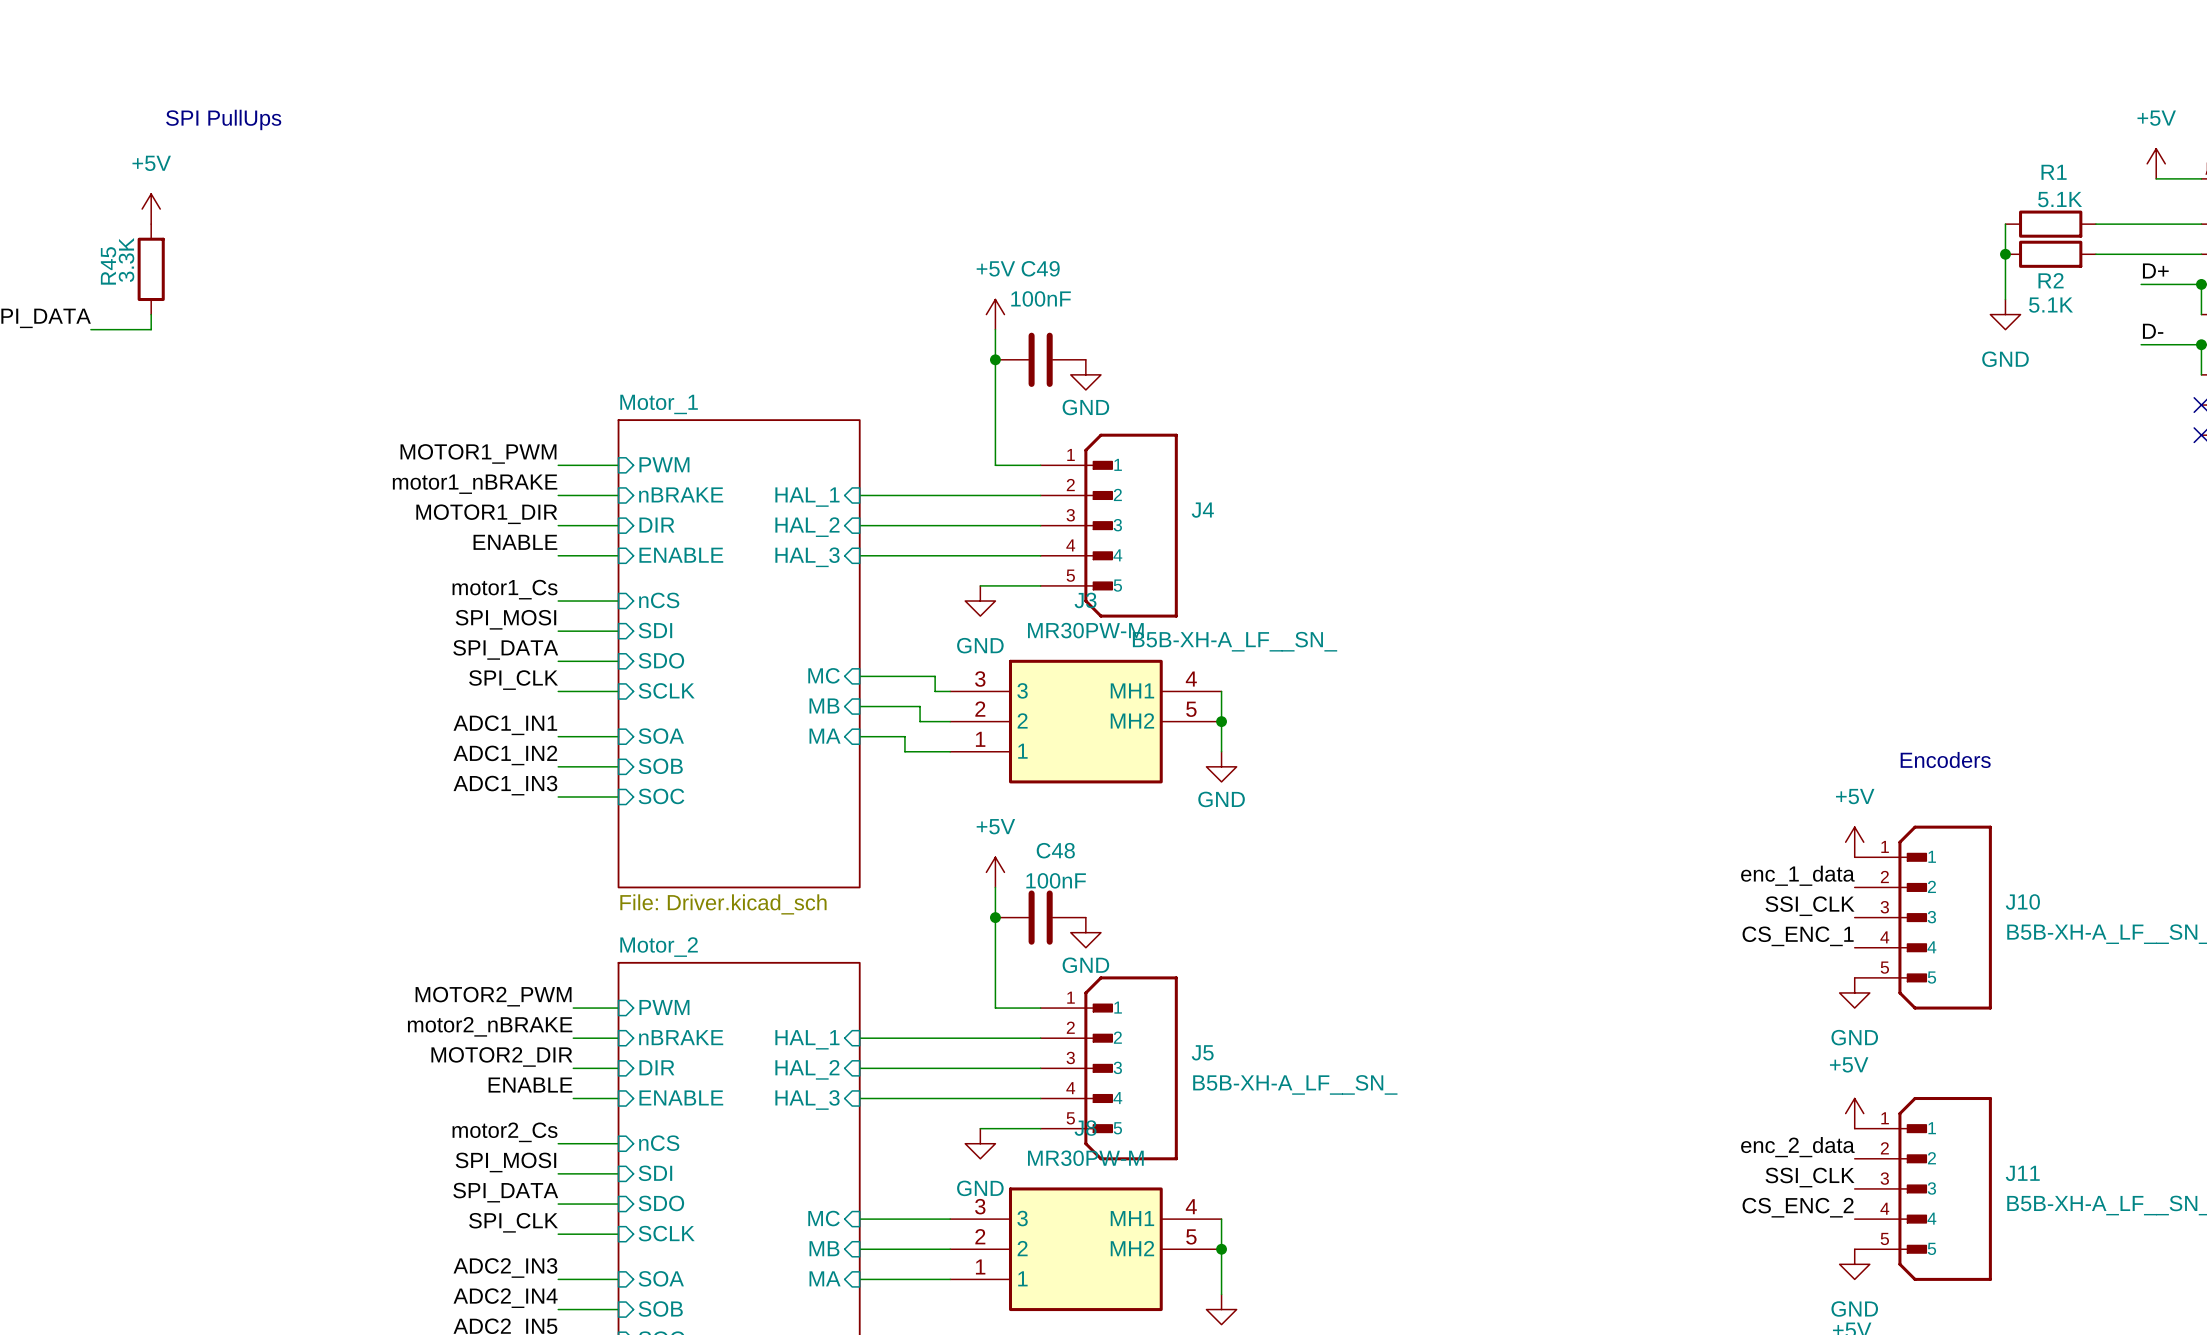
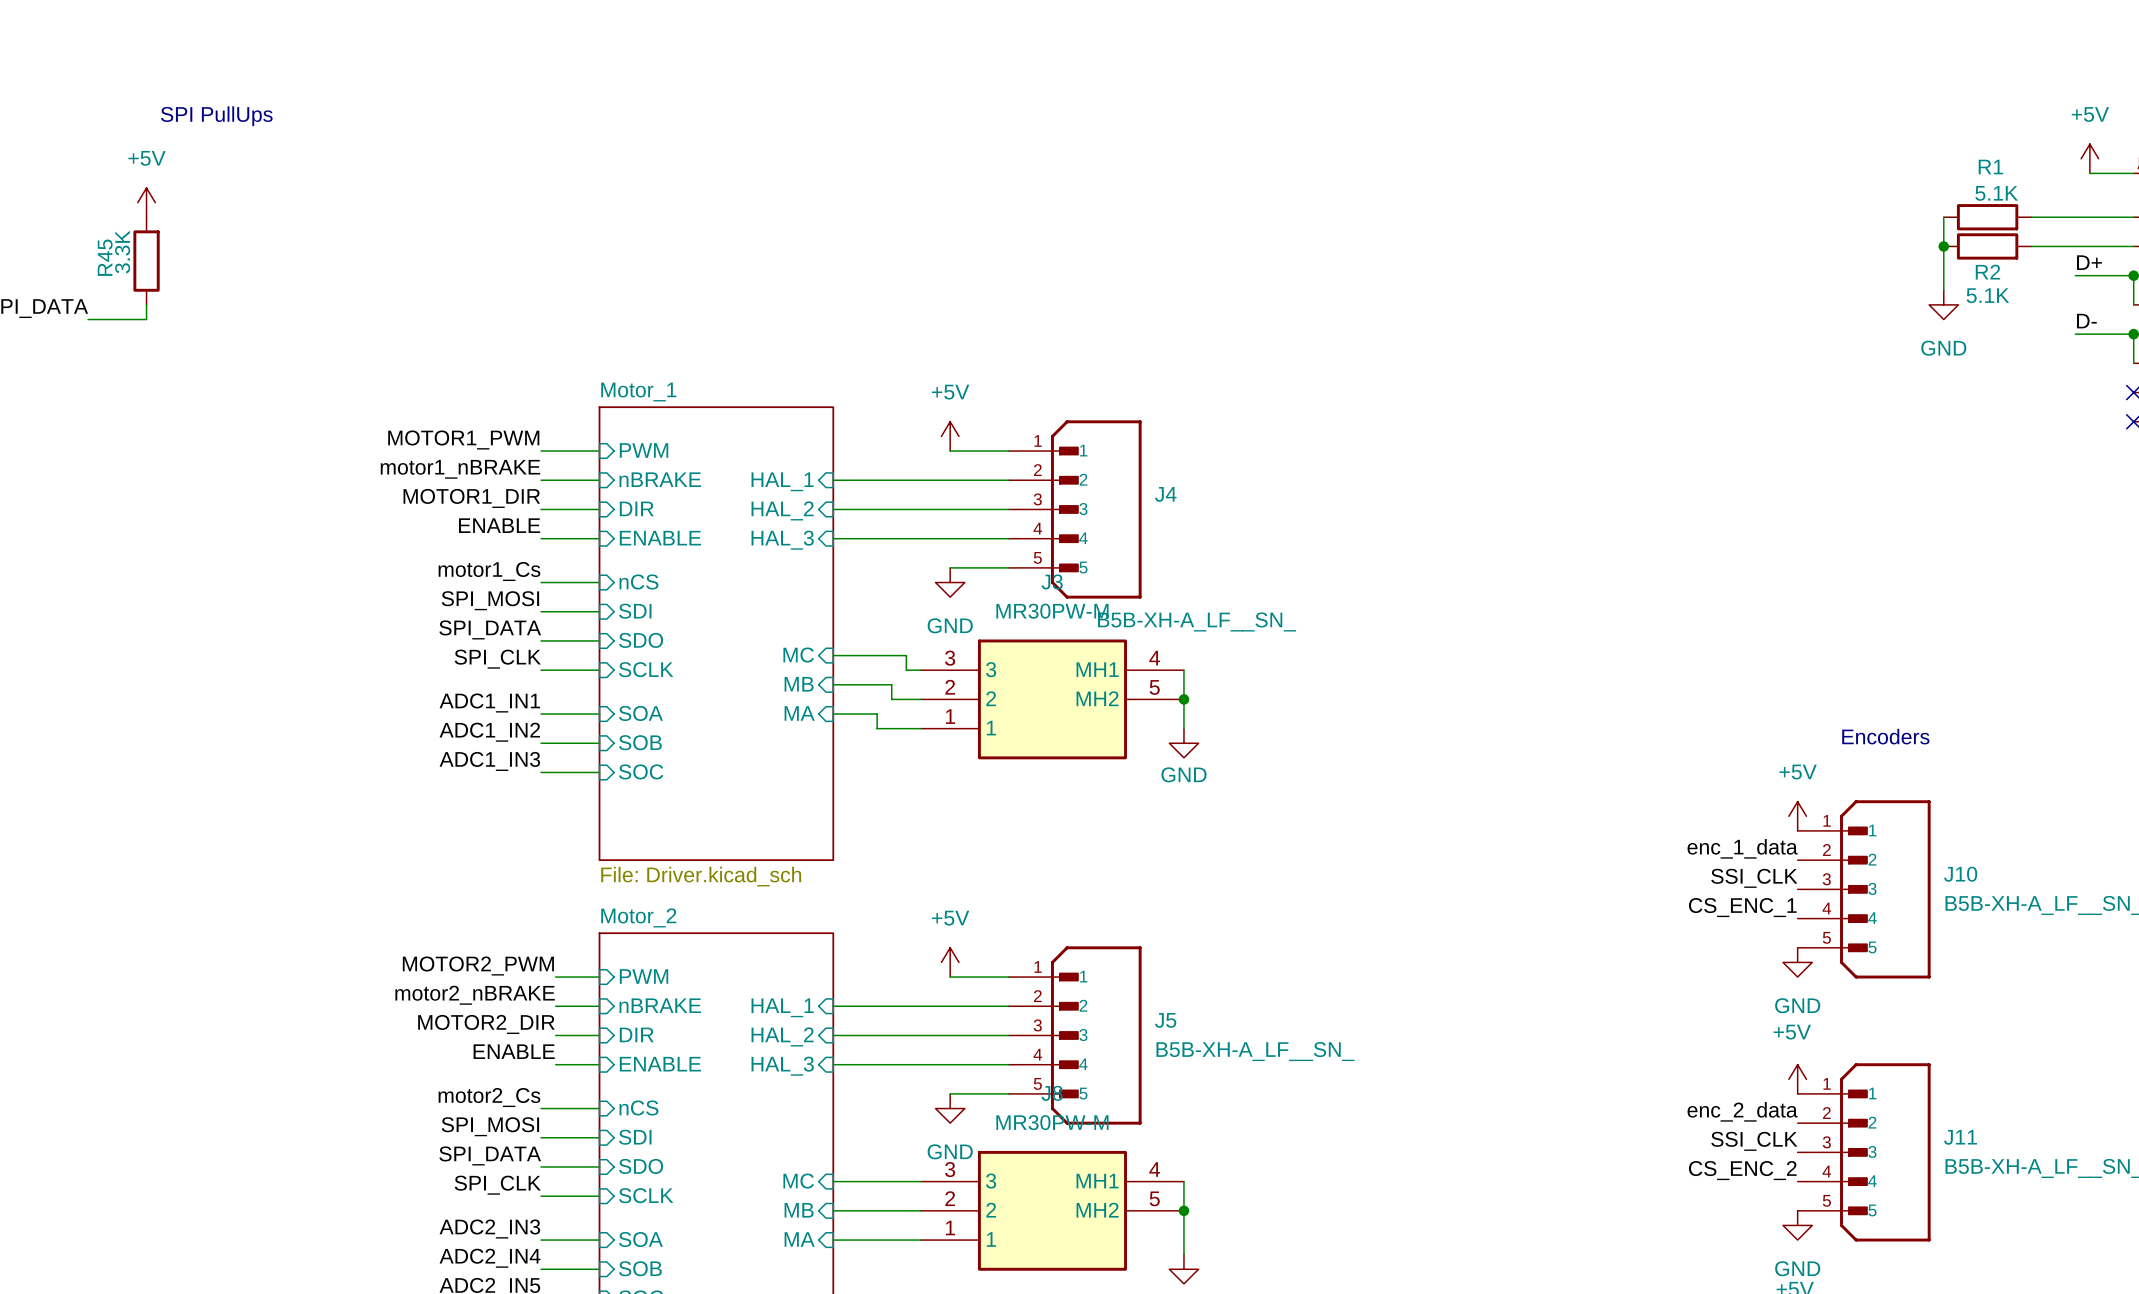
power symbol position: +5V (995, 314) -> +5V (950, 436)
wire: (995, 329) (995, 465) -> (950, 451) (964, 451)
junction: (995, 359) -> none
C49: 100nF (1040, 359) -> none
power symbol: GND (1085, 374) -> none
power symbol position: +5V (995, 872) -> +5V (950, 962)
wire: (995, 887) (995, 1008) -> (950, 977) (964, 977)
junction: (995, 917) -> none
C48: 100nF (1040, 917) -> none
power symbol: GND (1085, 932) -> none

